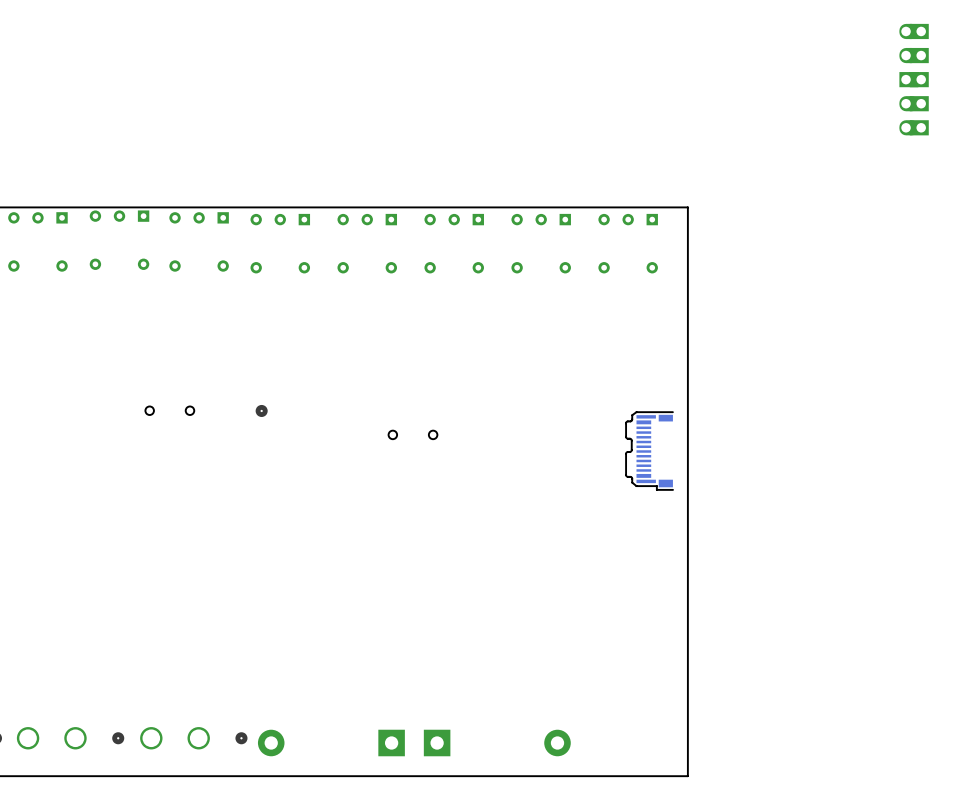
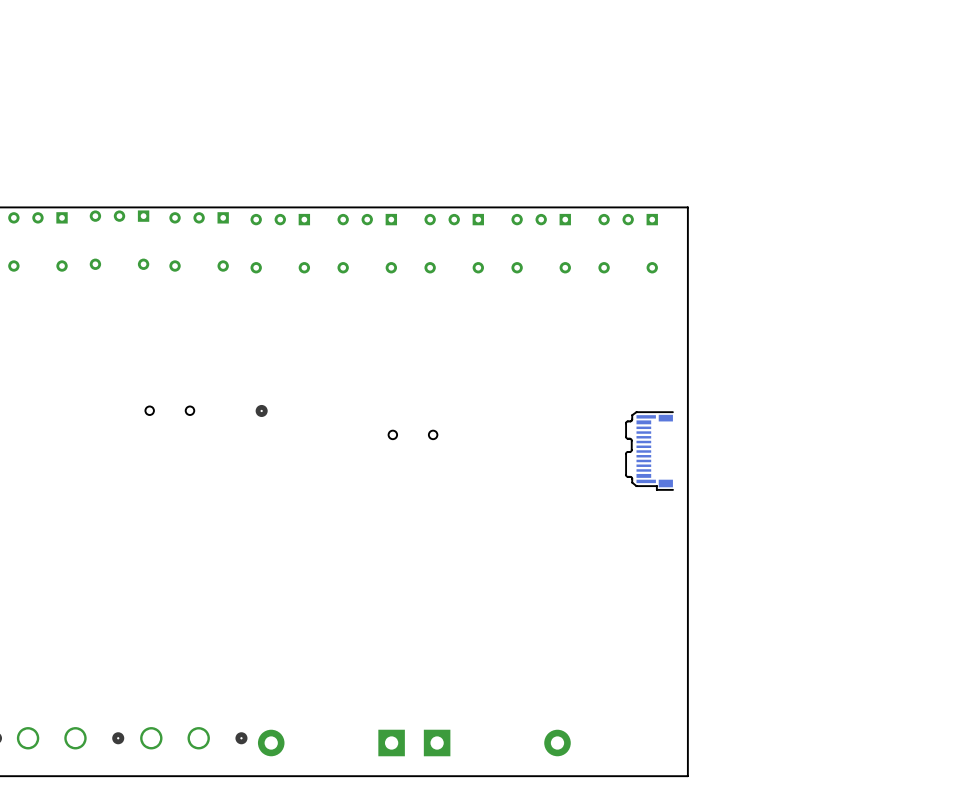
part: (914, 79) -> none

